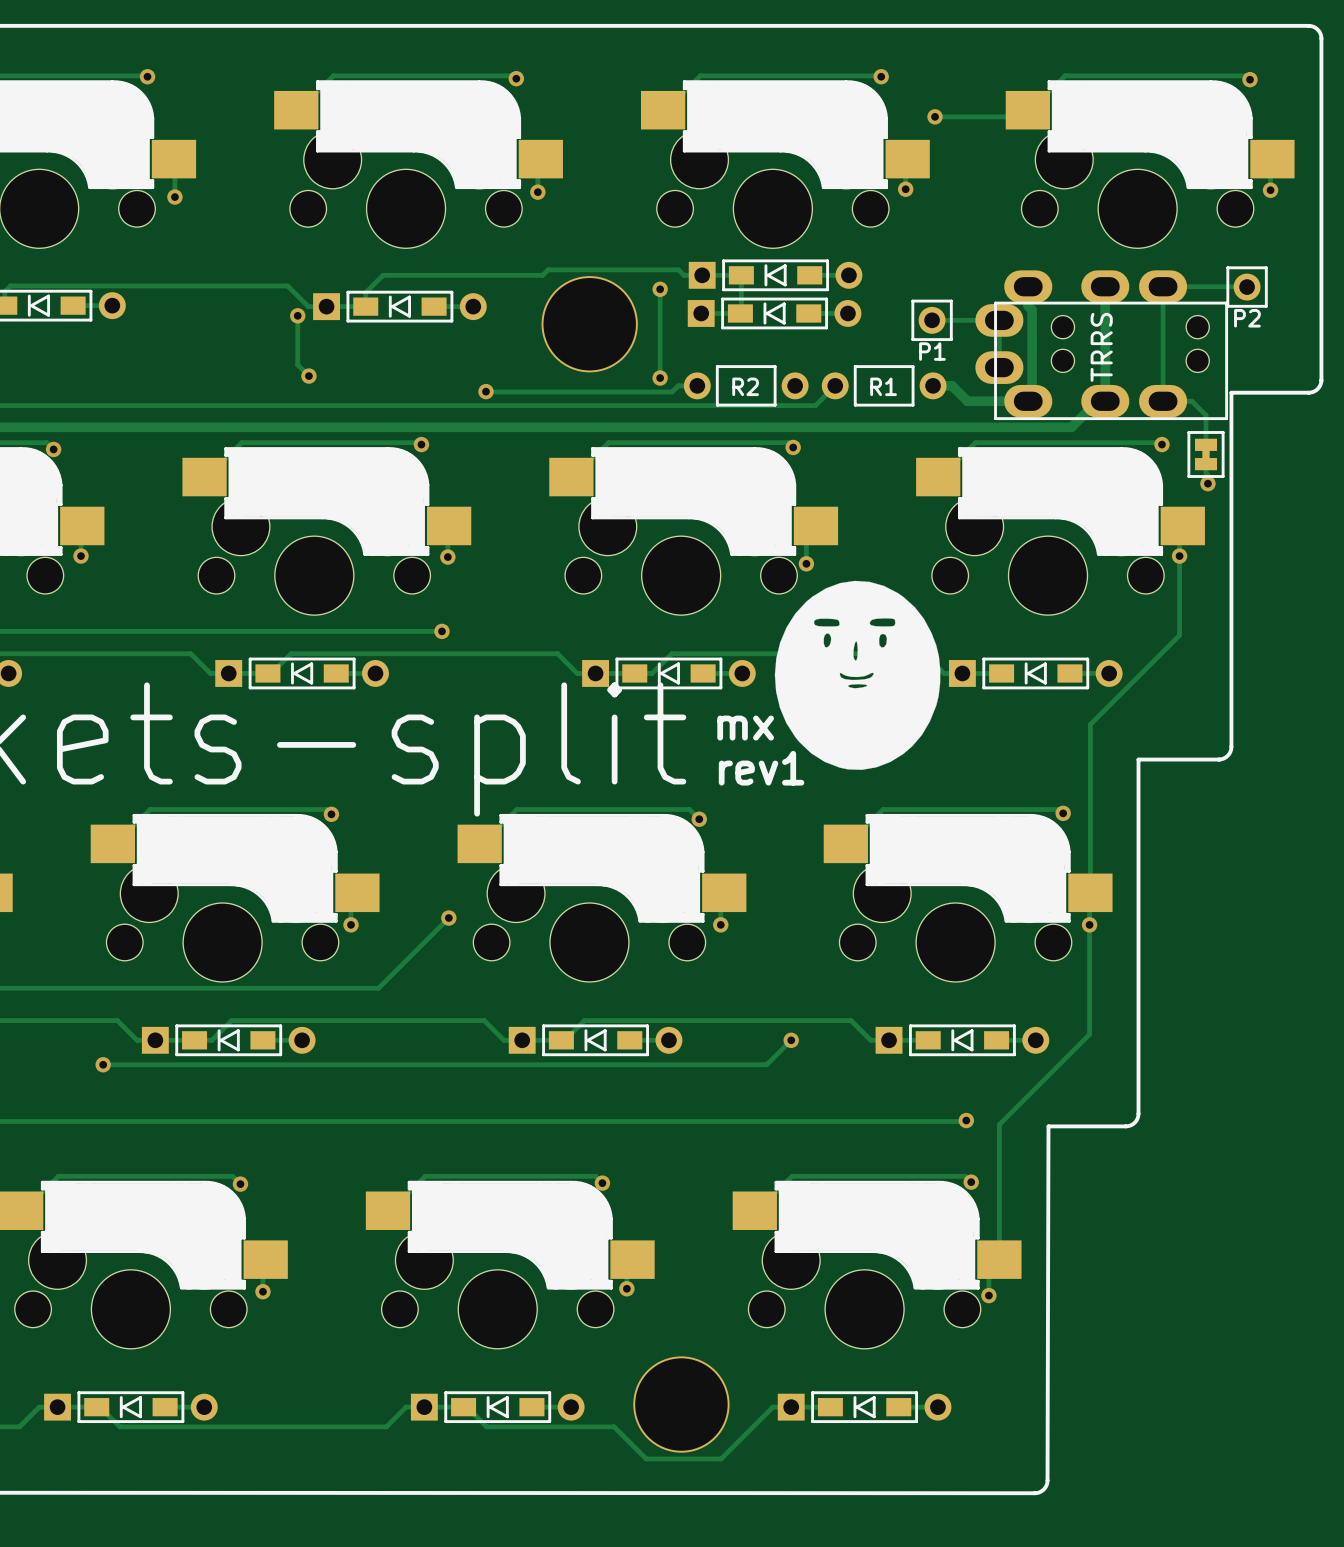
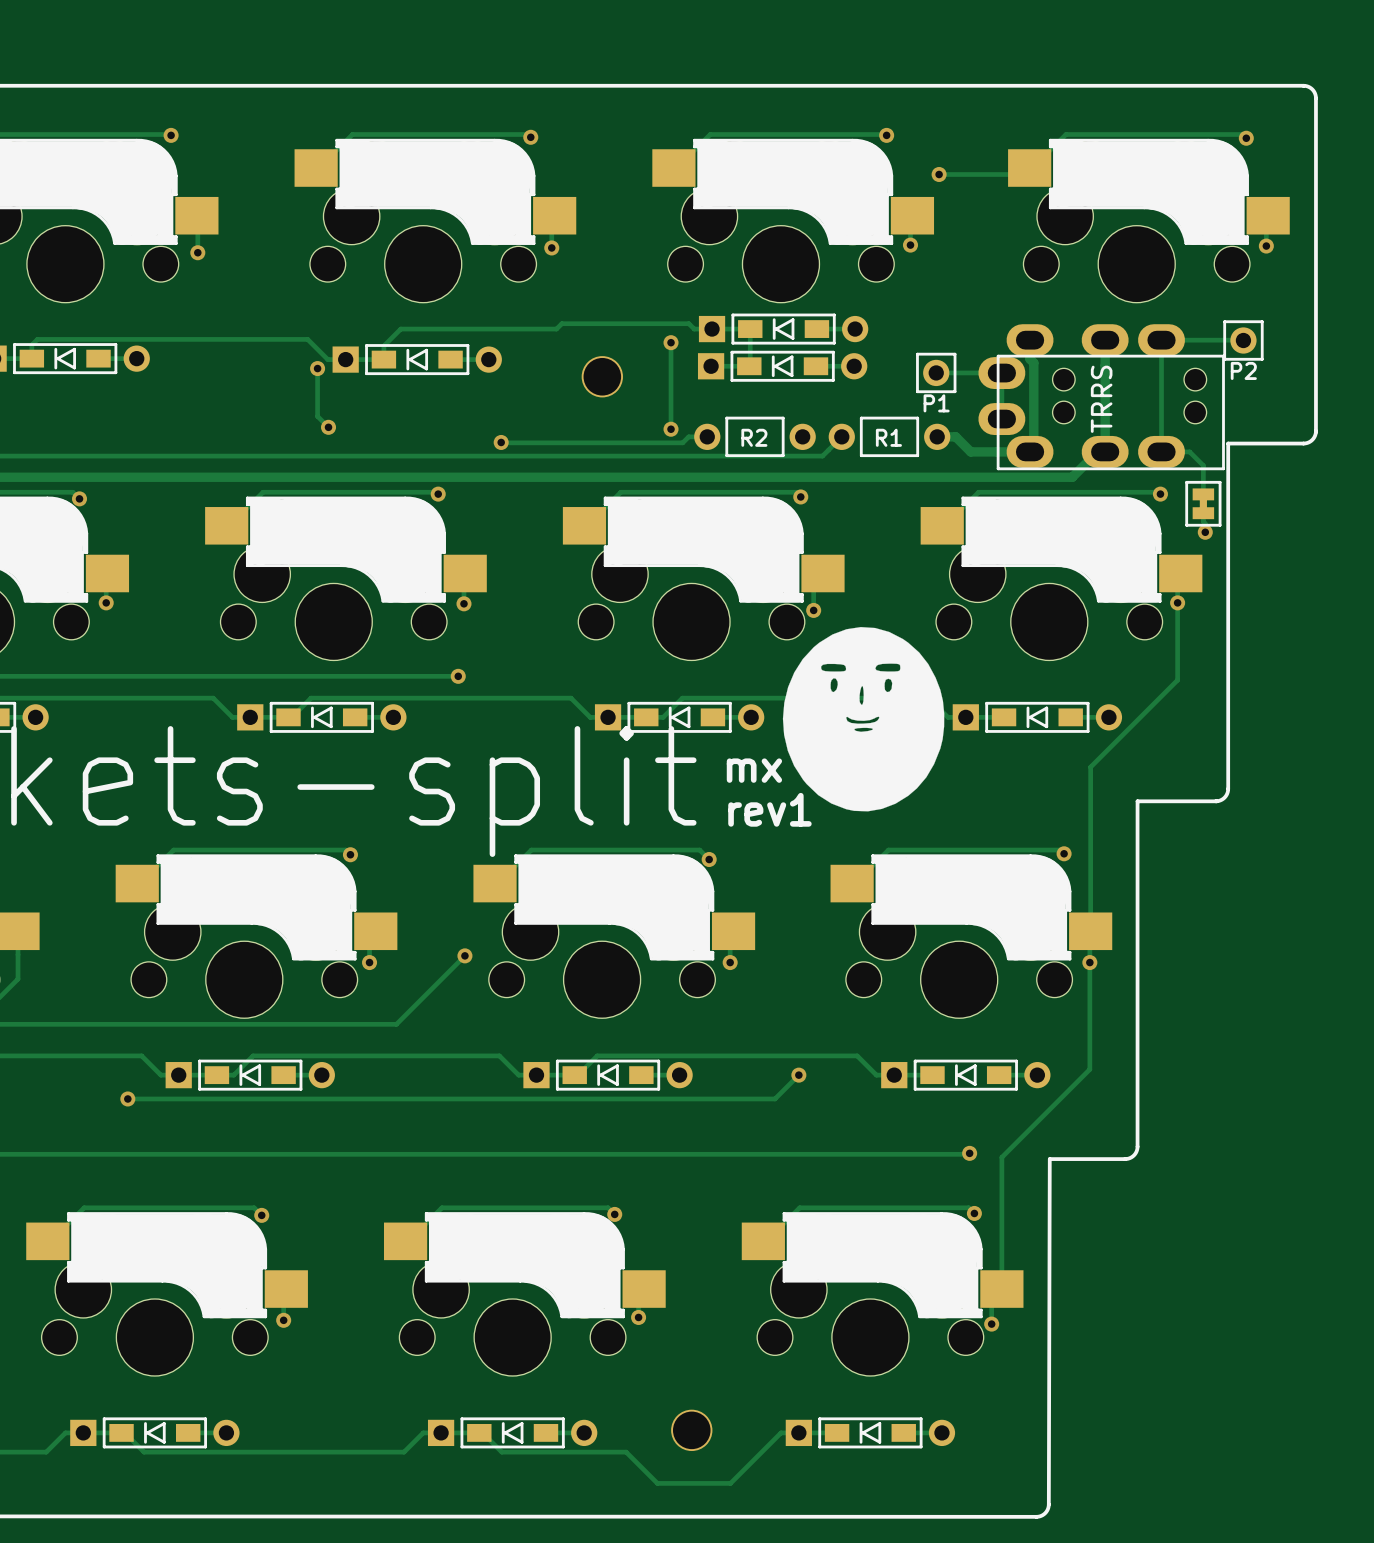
part footprint: [541, 276, 638, 373] -> [581, 356, 623, 398]
part footprint: [633, 1356, 730, 1453] -> [671, 1409, 713, 1452]

